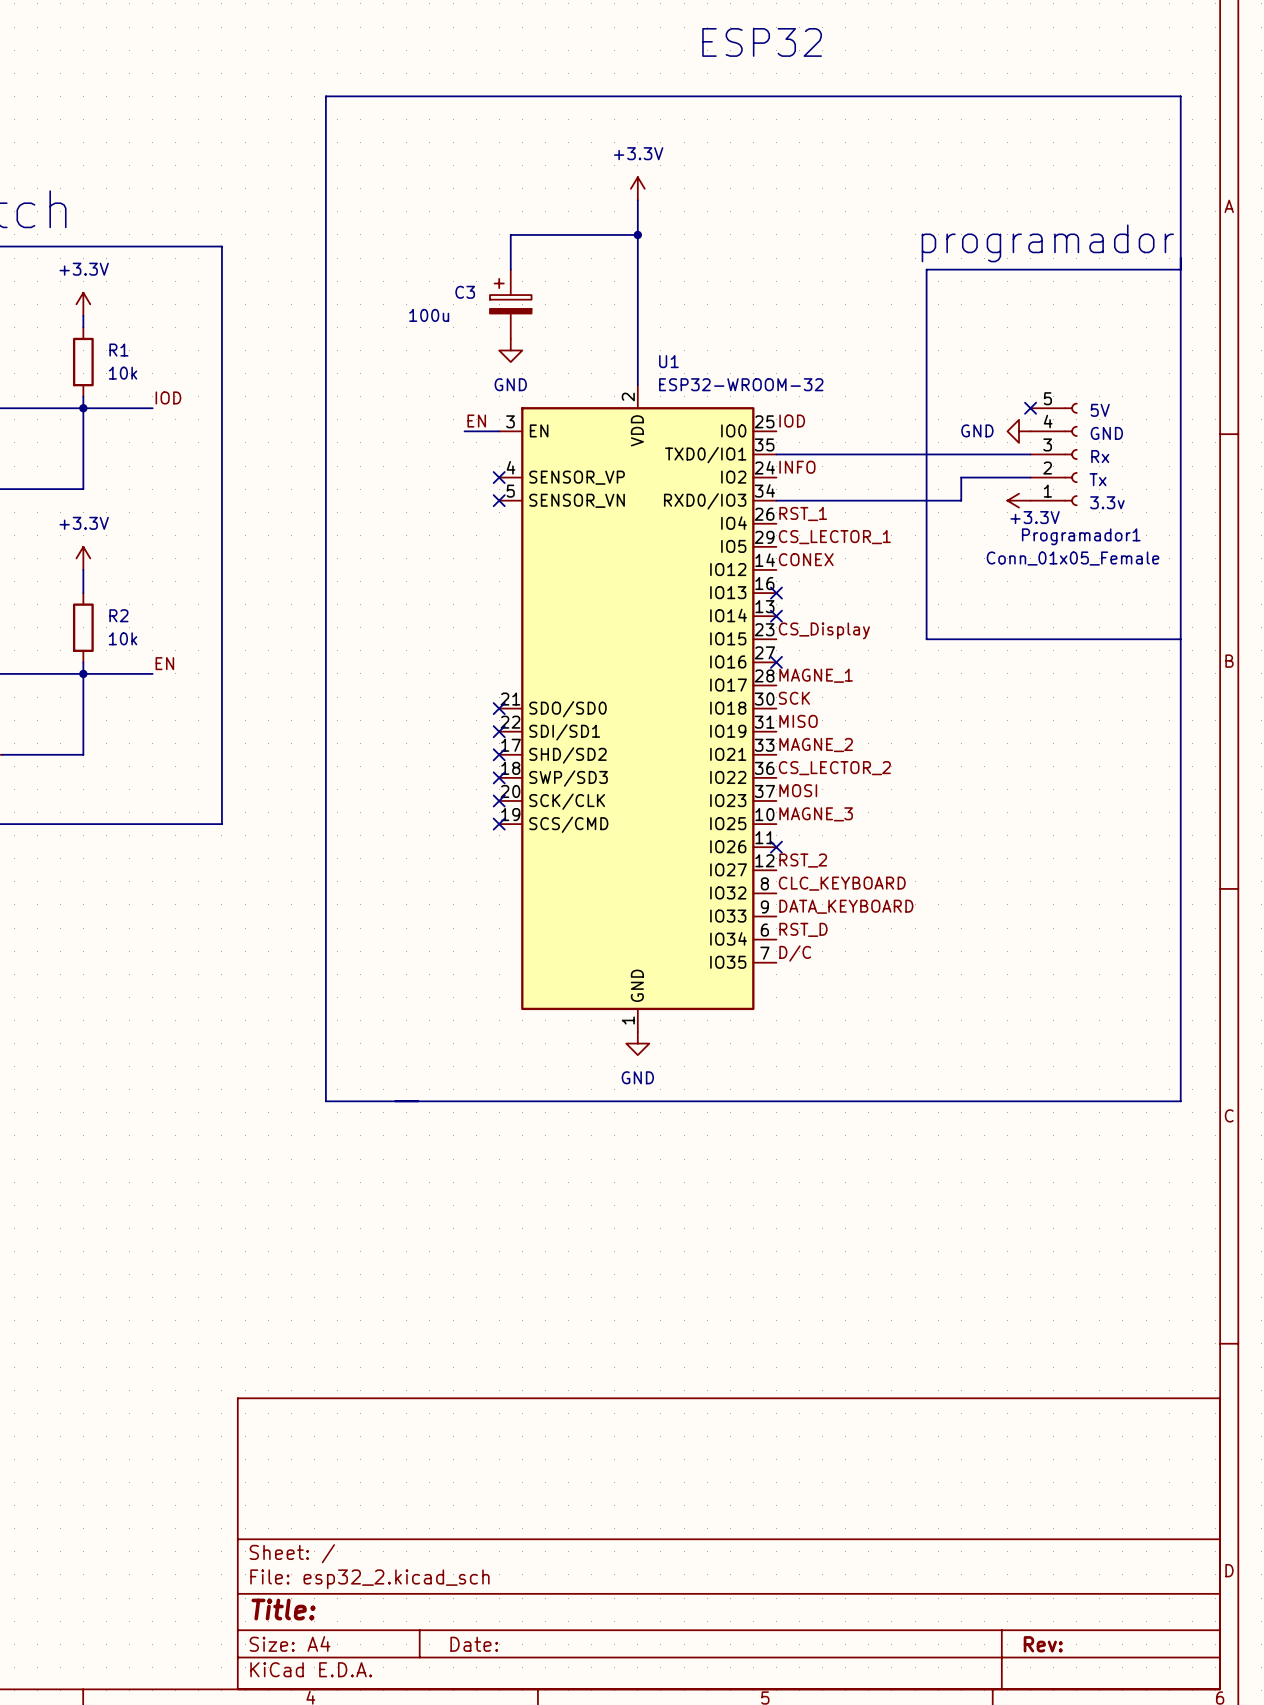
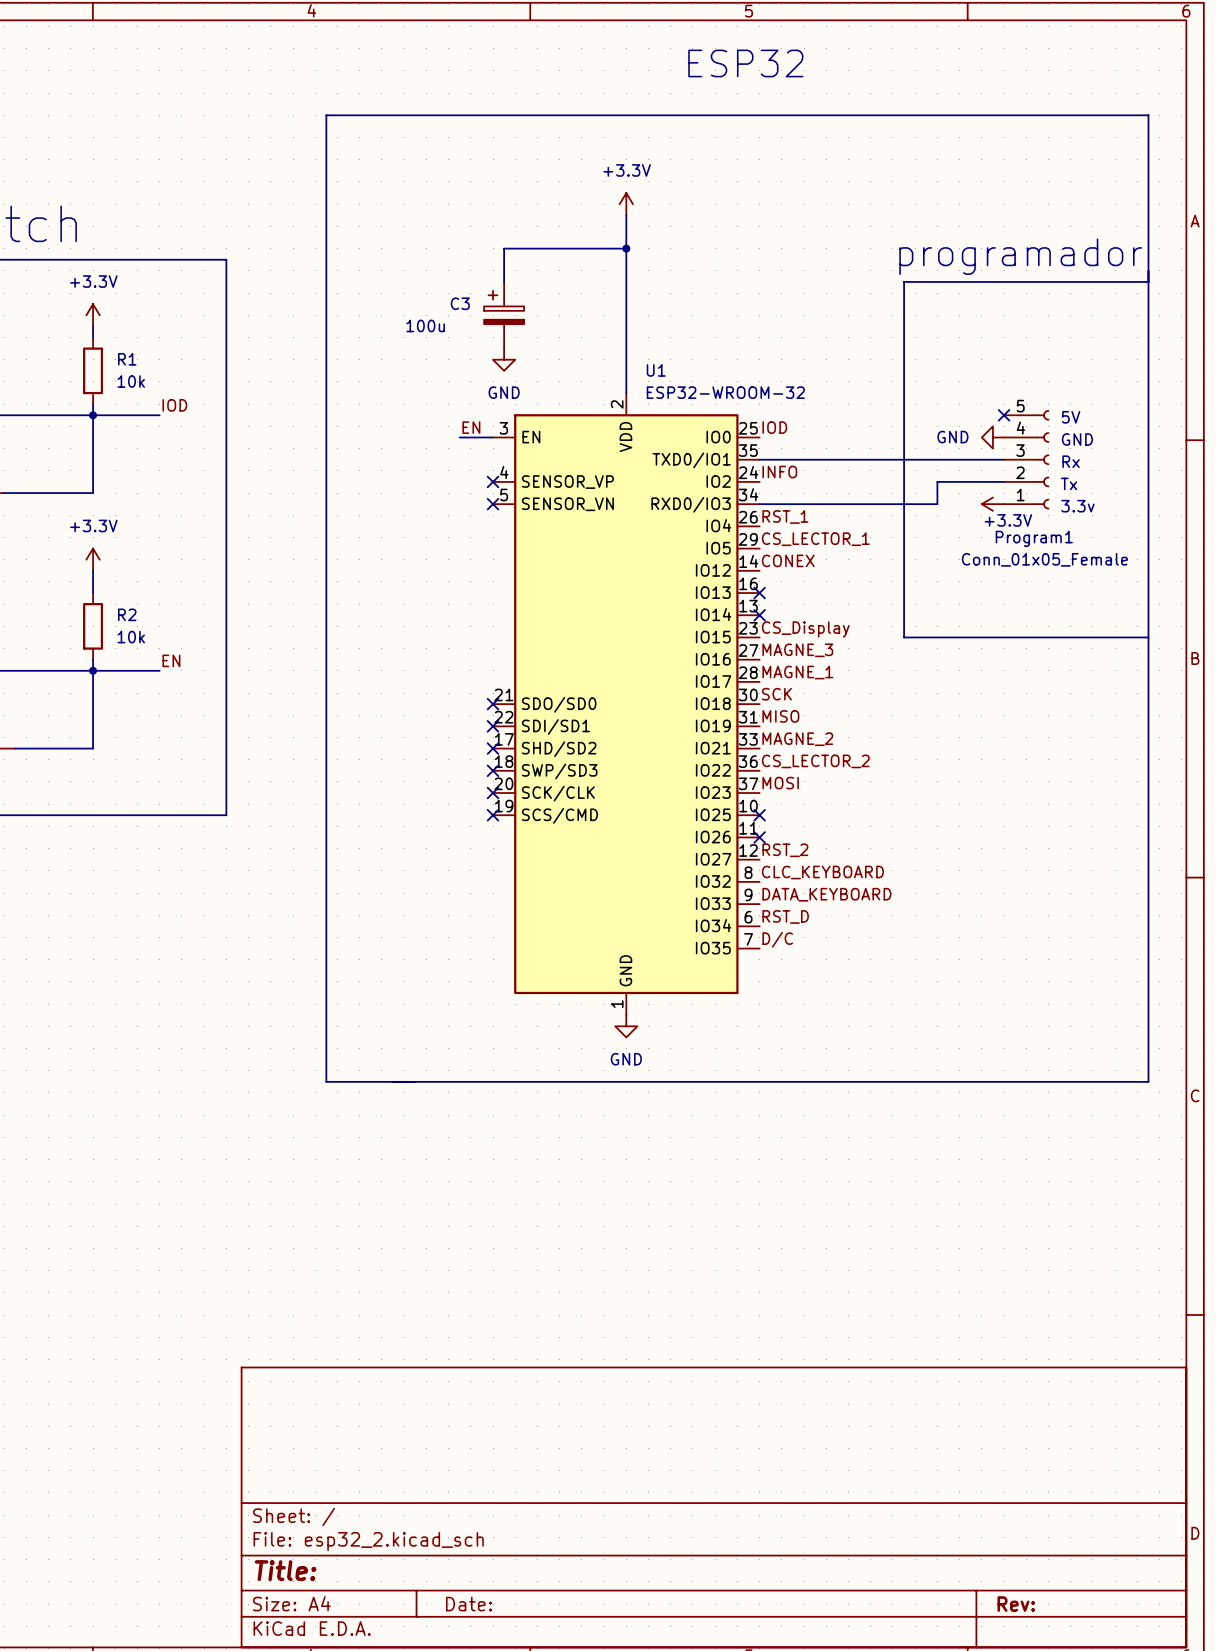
Programador1 name: Programador1 (1081, 536) -> Program1 (1034, 538)
no-connect mark: (776, 662) -> none
label position: MAGNE_3 (816, 814) -> MAGNE_3 (797, 650)
no-connect mark: none -> (759, 815)

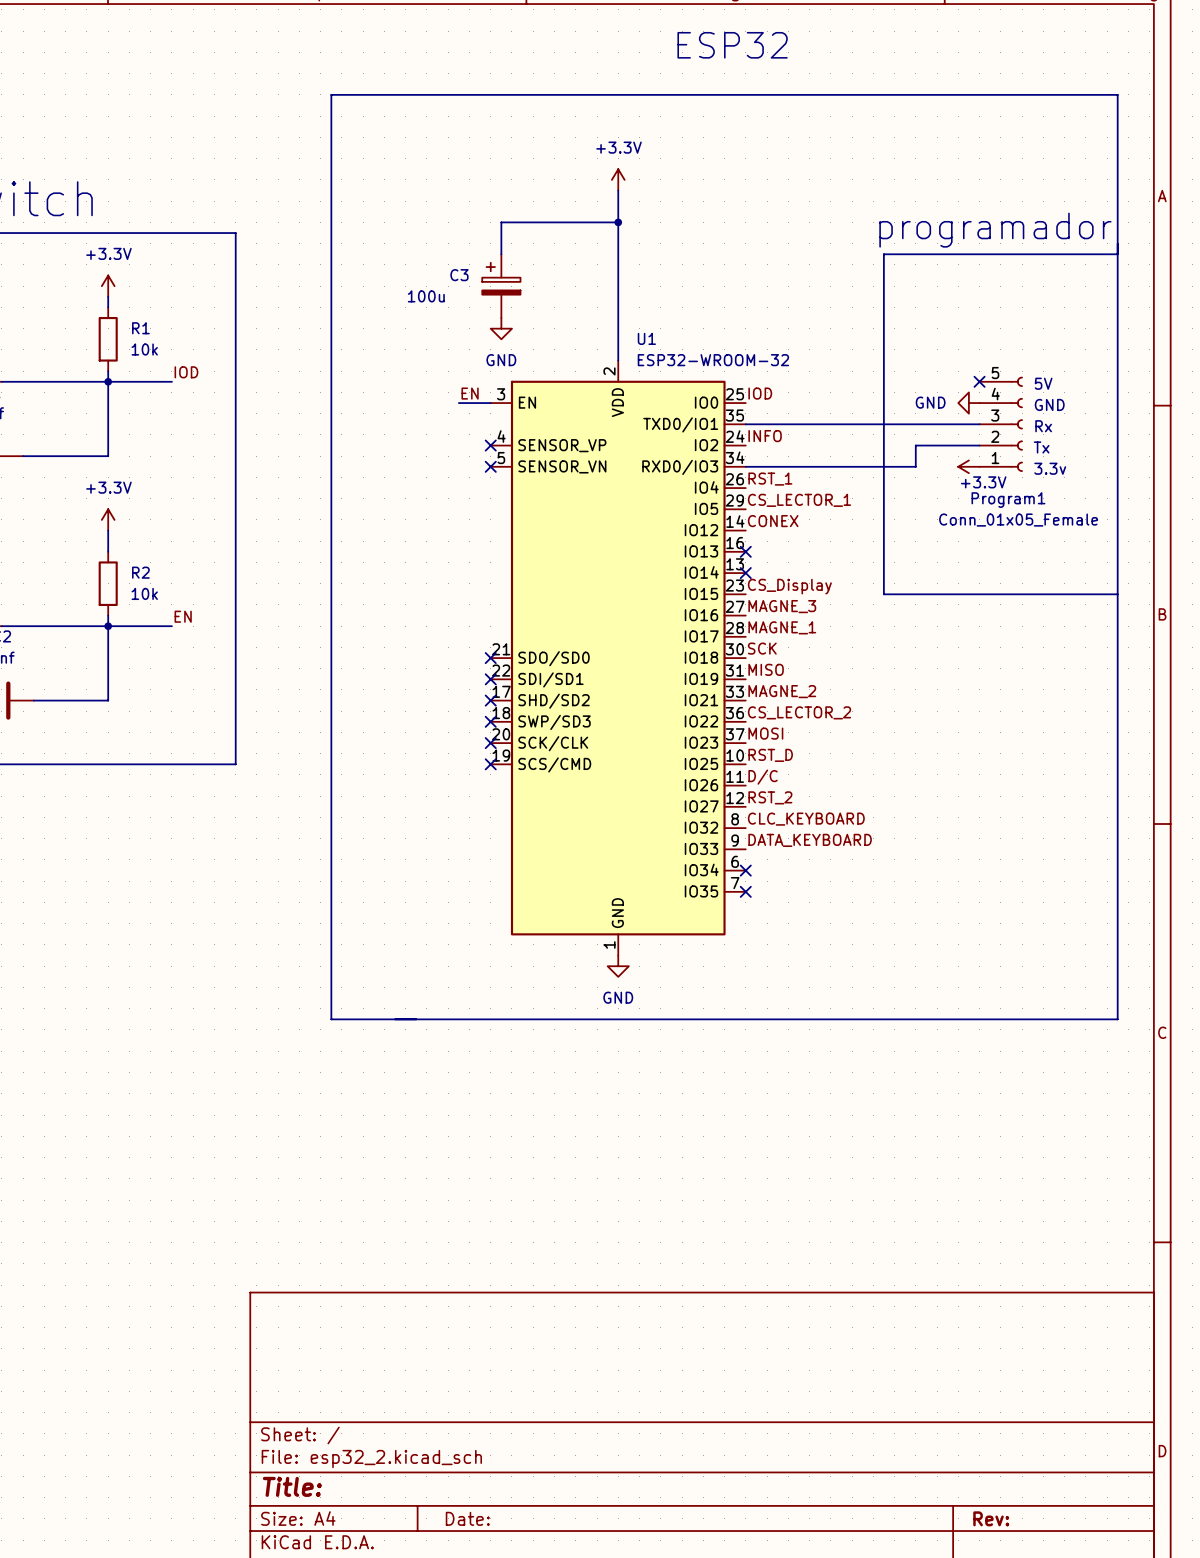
no-connect mark: (759, 815) -> none
no-connect mark: (759, 837) -> none
label position: RST_D (785, 916) -> RST_D (770, 755)
no-connect mark: none -> (745, 870)
label position: D/C (777, 939) -> D/C (763, 777)
no-connect mark: none -> (745, 891)

